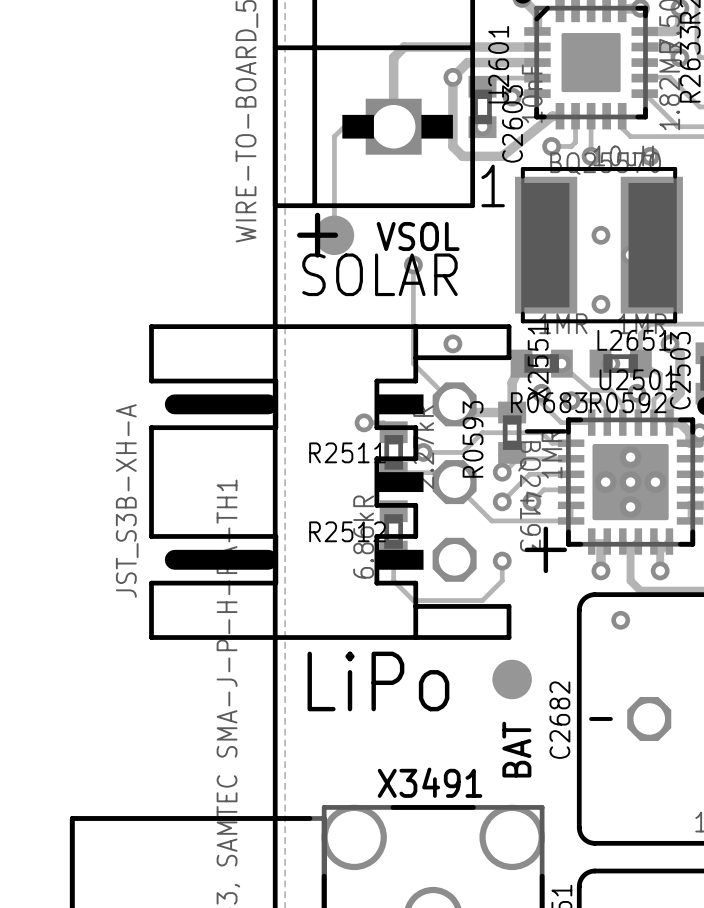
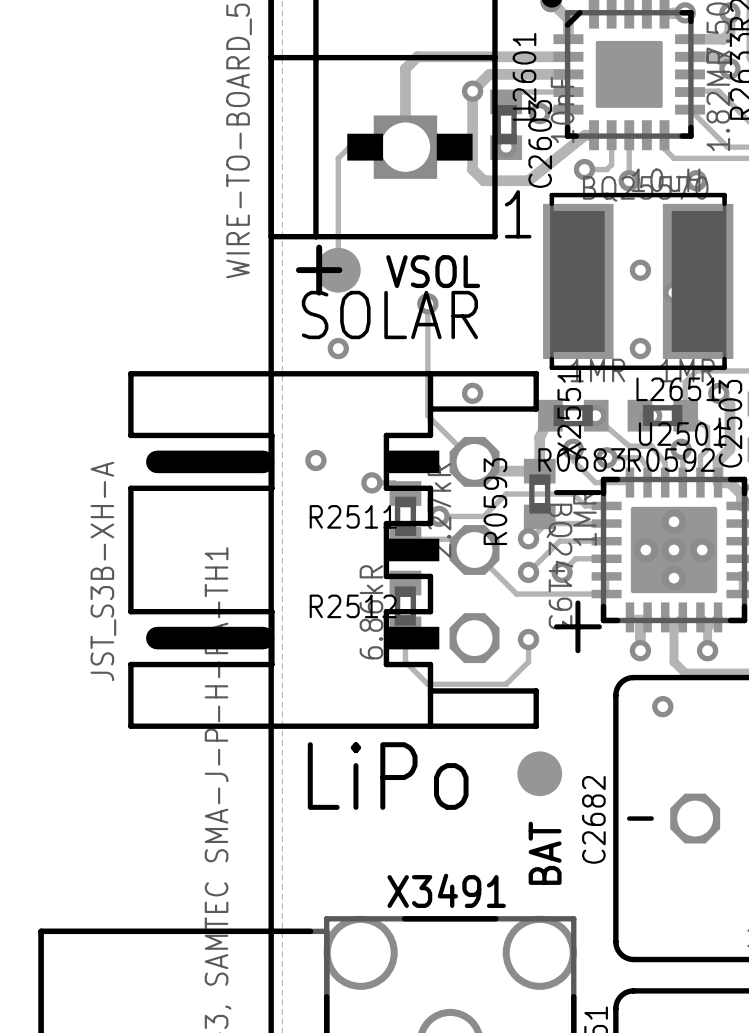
via: none -> (338, 348)
via: none -> (315, 460)

